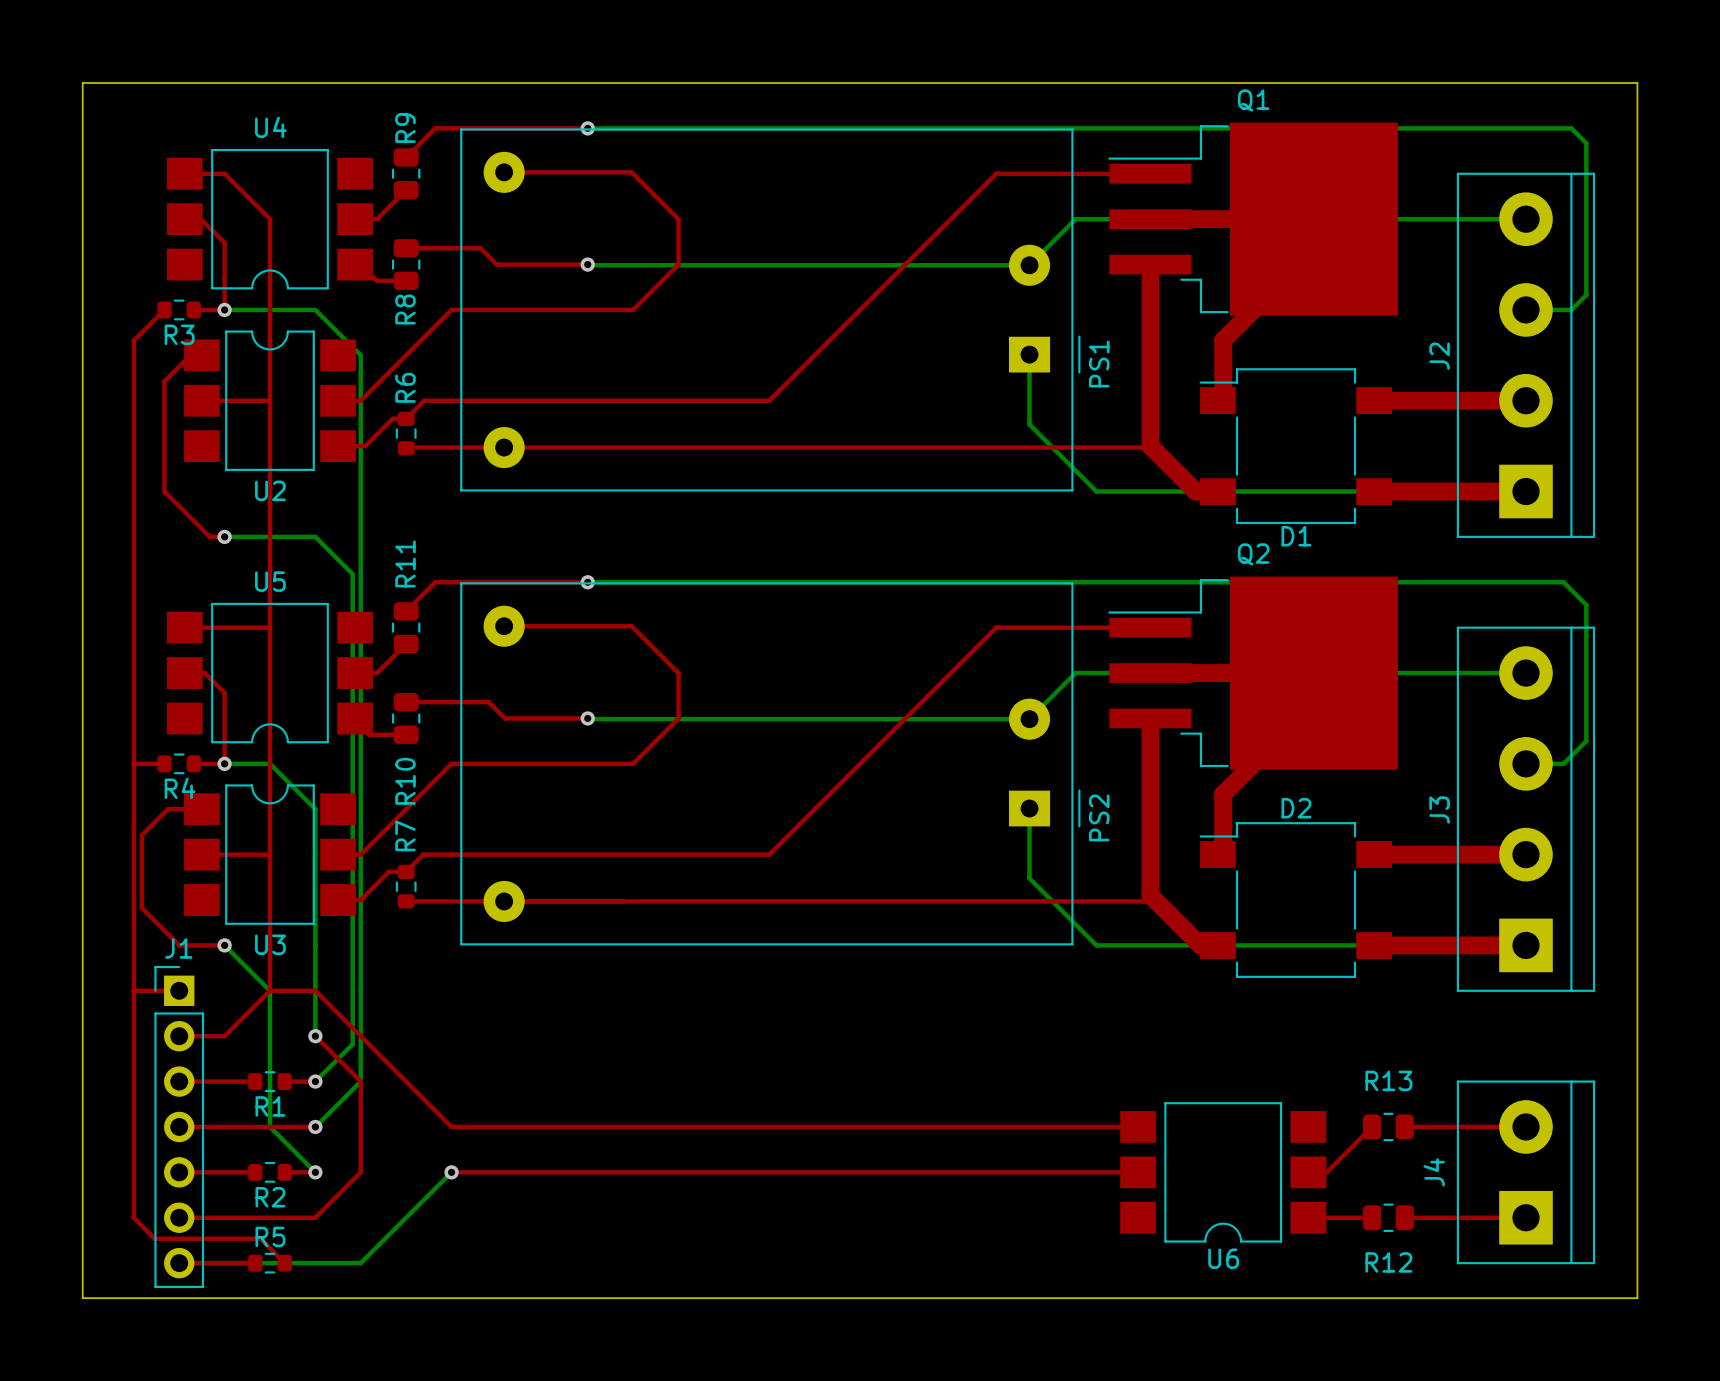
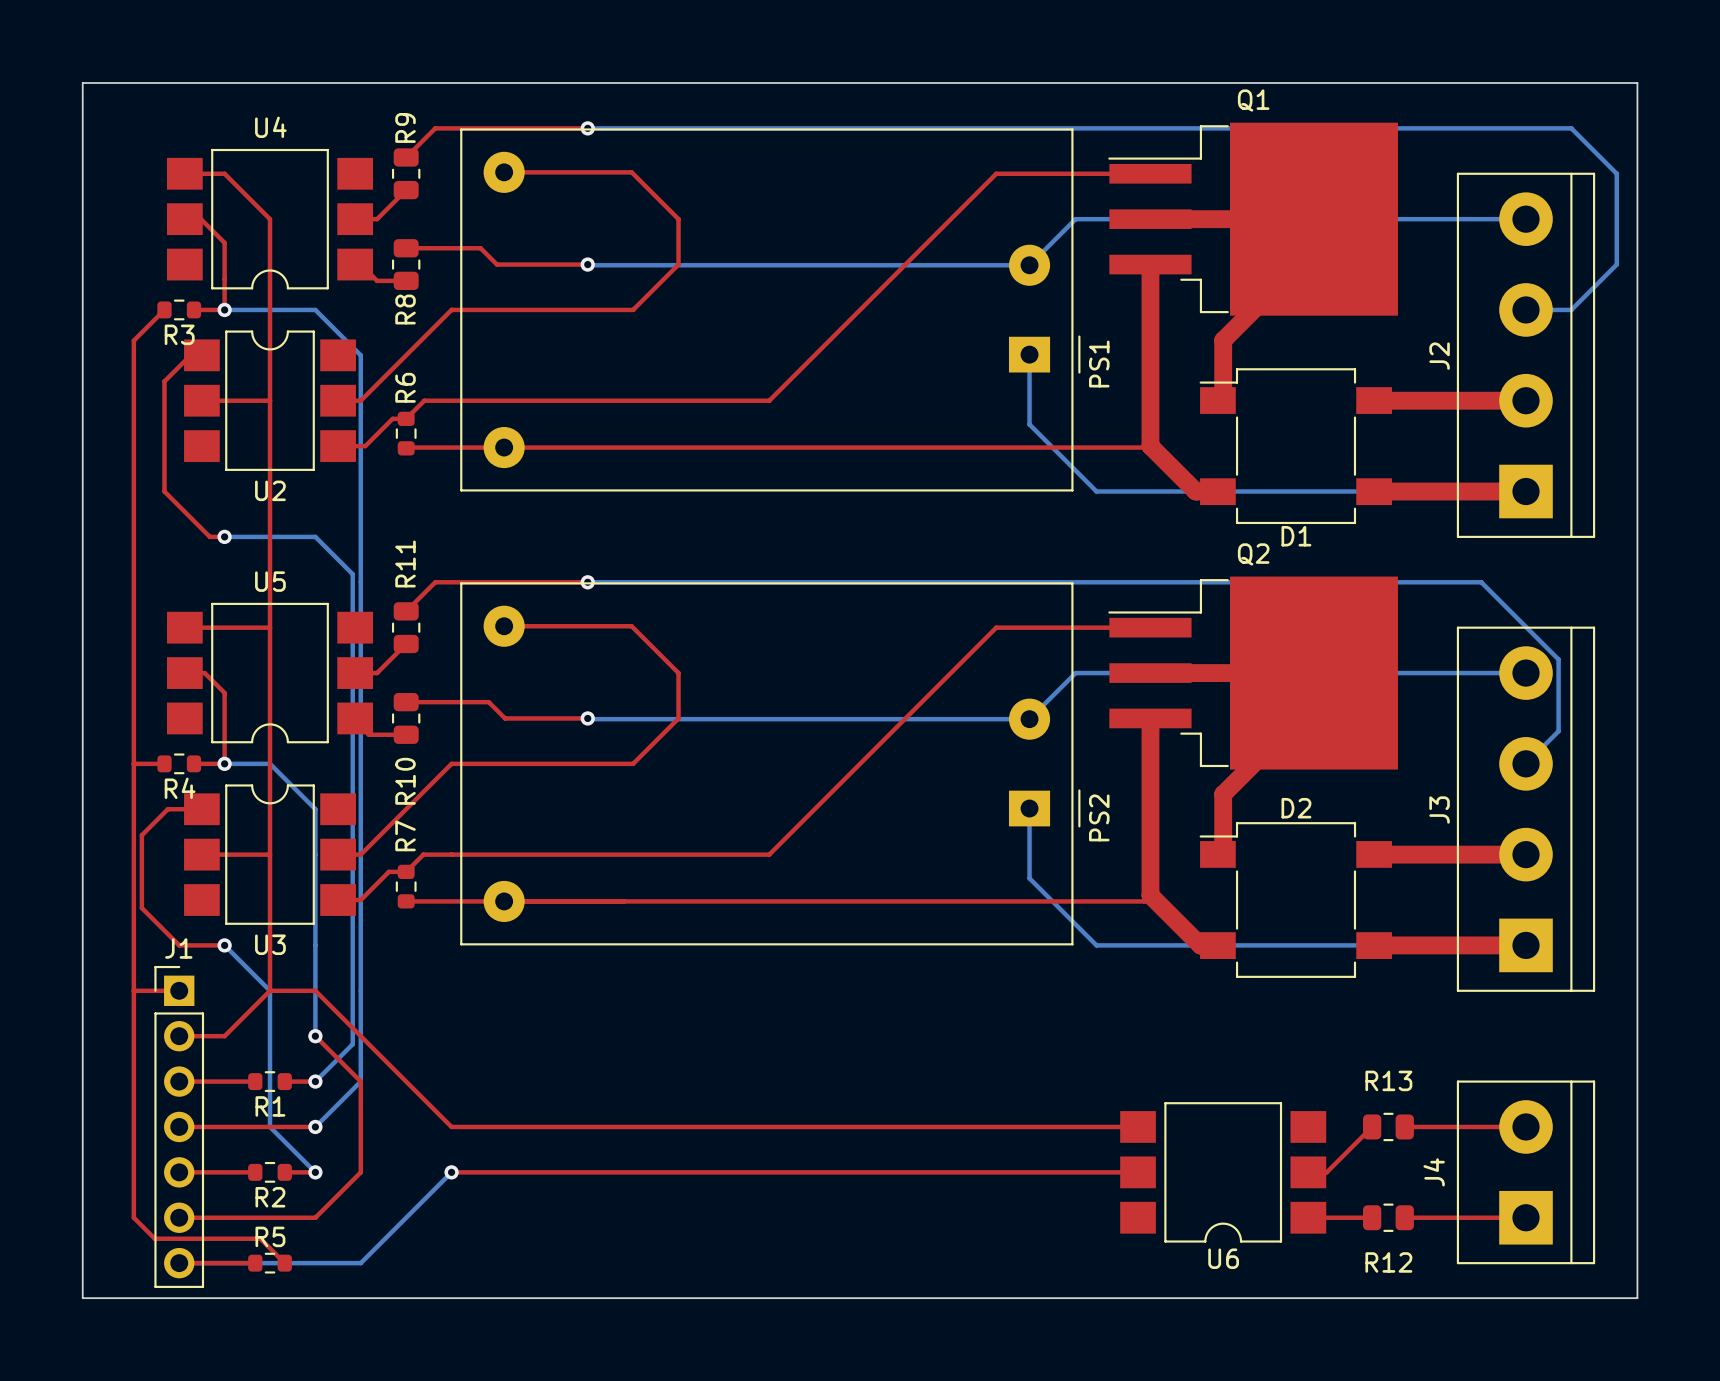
bottom track: (1586, 143) (1586, 295) -> (1586, 143) (1616, 173) (1616, 264) (1586, 295)
bottom track: (1481, 582) (1563, 582) (1586, 604) (1586, 741) (1563, 763) (1526, 763) -> (1481, 582) (1558, 659) (1558, 731) (1526, 763)

